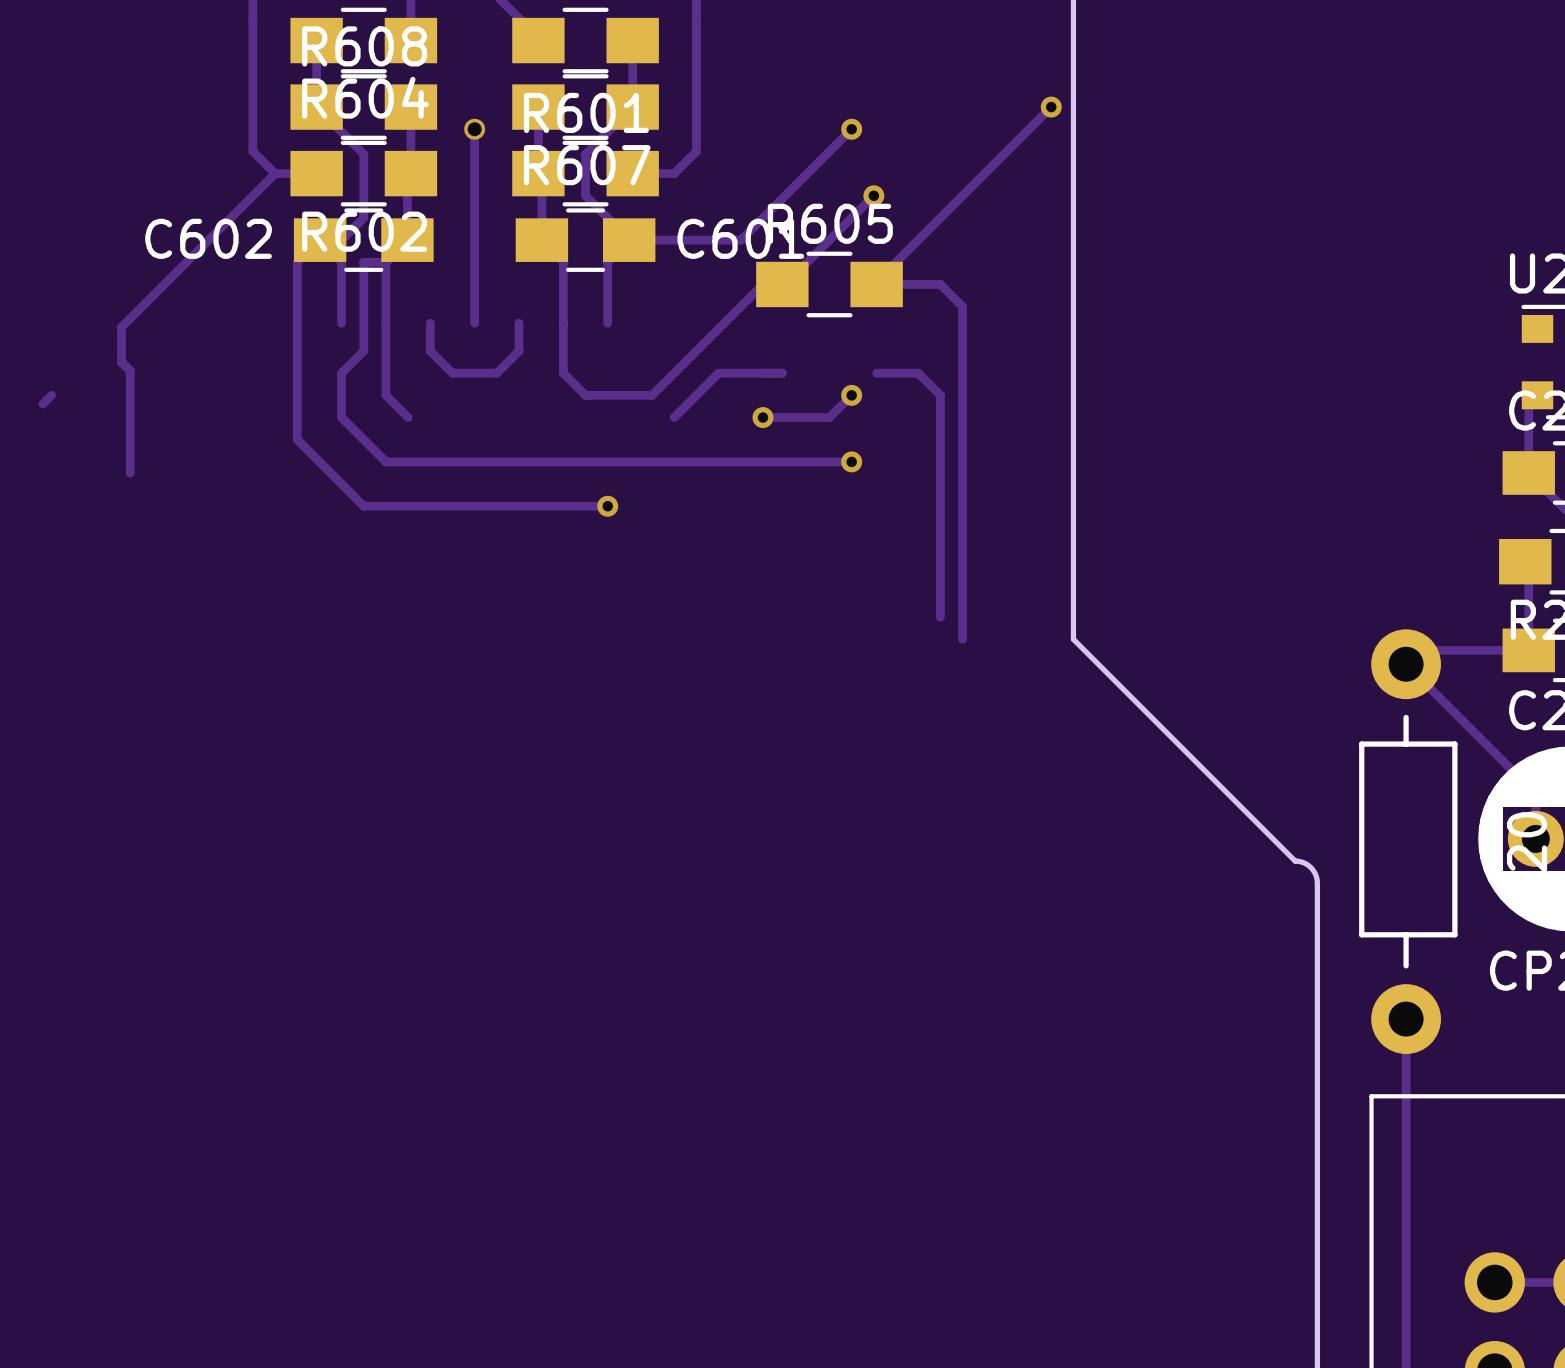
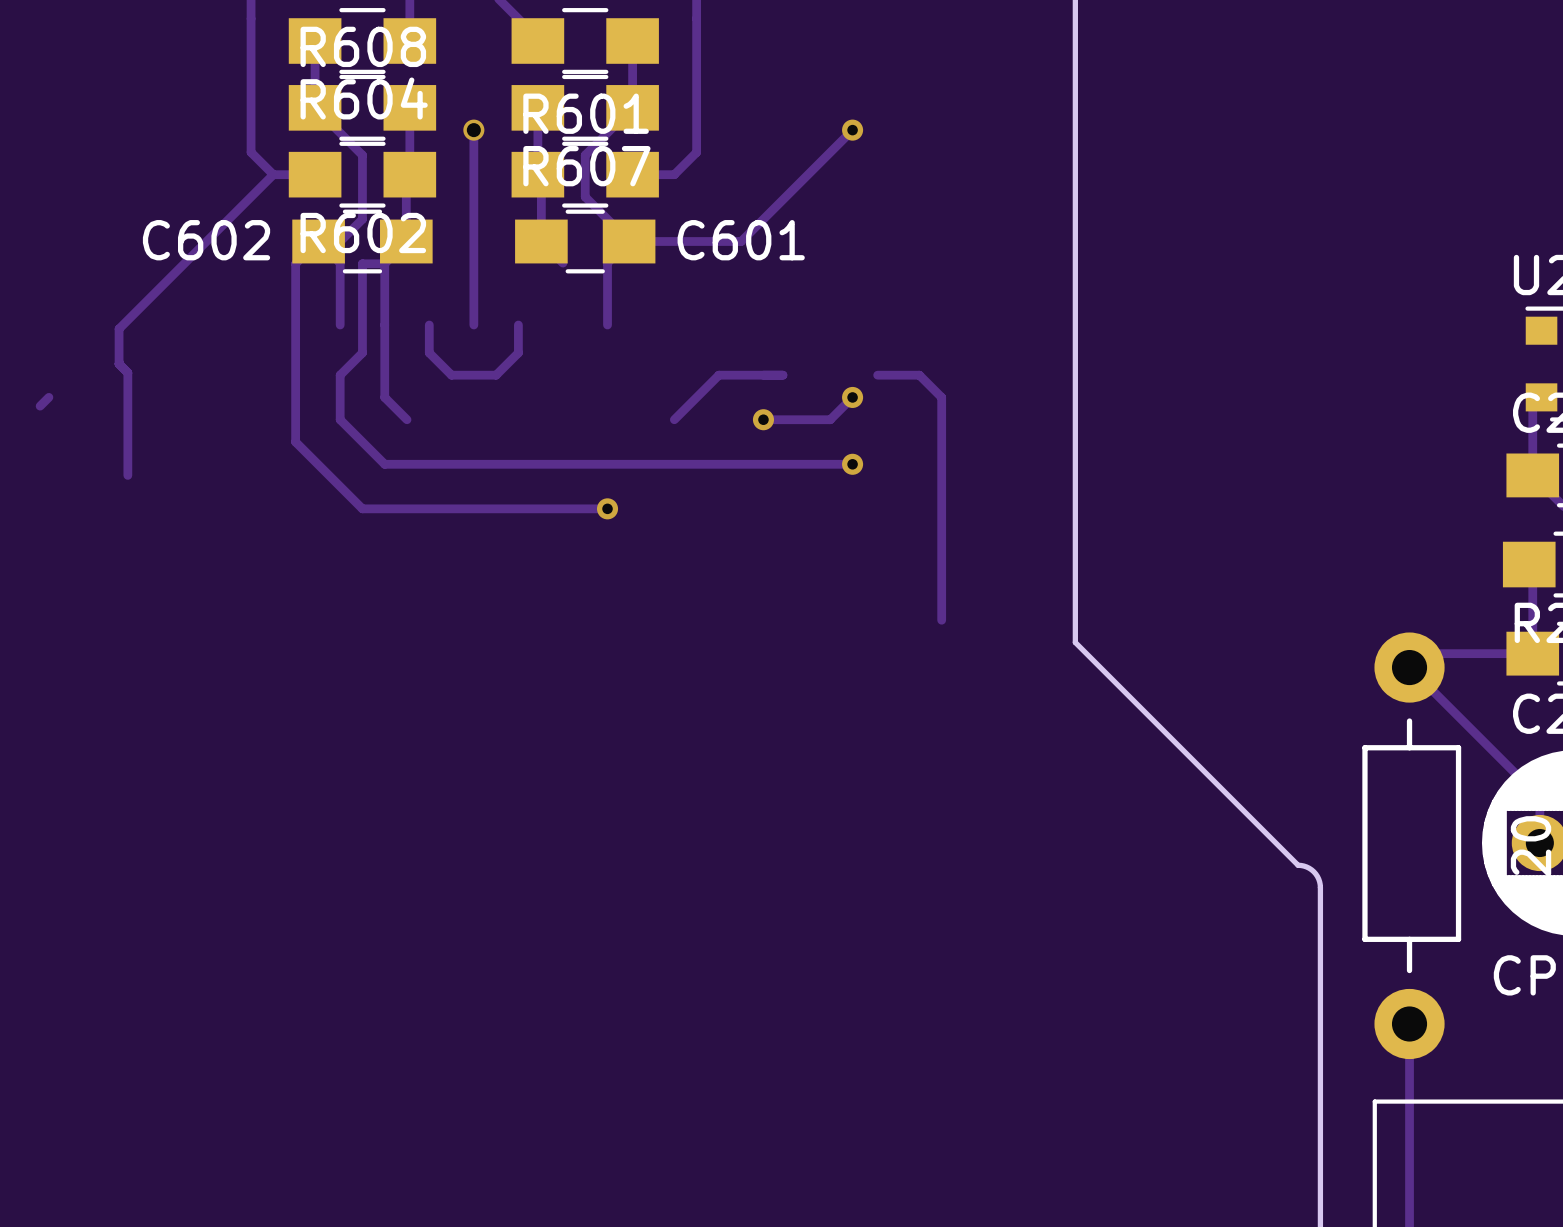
track: (1051, 107) (873, 284) (940, 284) (962, 306) (962, 639) -> none
via: (1051, 107) -> none
track: (873, 195) (785, 284) (762, 284) (652, 395) (585, 395) (563, 373) (563, 261) -> none
via: (873, 195) -> none
R605: (829, 284) -> none

